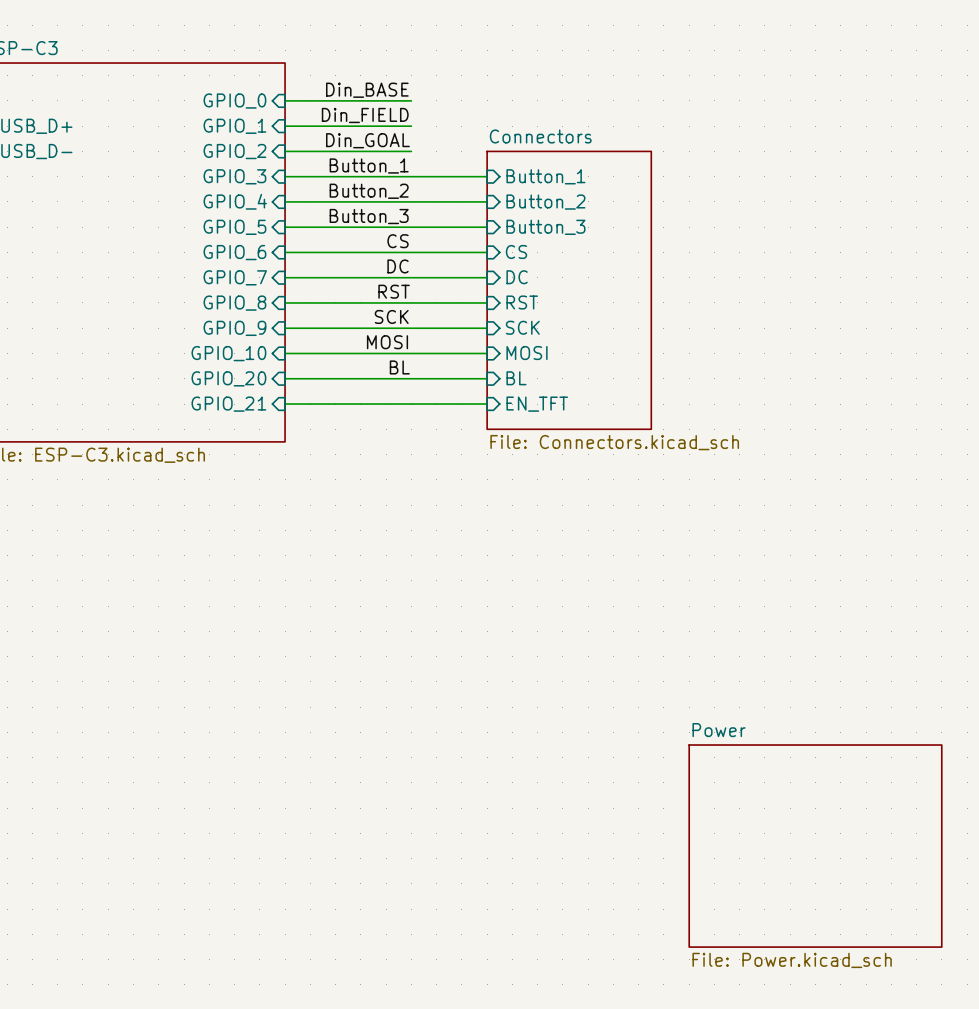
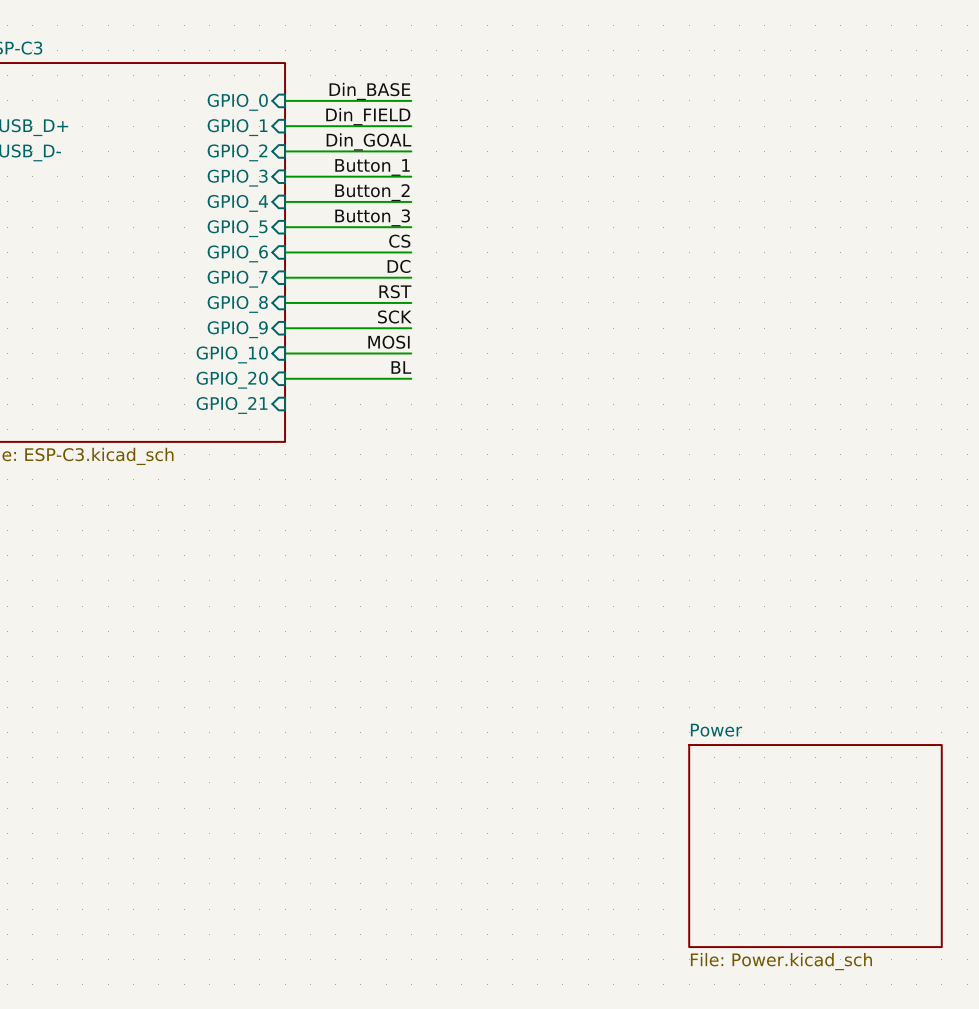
wire: (411, 176) (487, 176) -> none
sheet pin: Button_1 (545, 176) -> none
wire: (411, 201) (487, 201) -> none
sheet pin: Button_2 (545, 202) -> none
wire: (411, 227) (487, 227) -> none
sheet pin: Button_3 (545, 227) -> none
sheet pin: CS (516, 251) -> none
wire: (411, 252) (487, 252) -> none
wire: (411, 277) (487, 277) -> none
sheet pin: DC (517, 277) -> none
sheet Connectors: File: Connectors.kicad_sch (569, 290) -> none
wire: (411, 302) (487, 302) -> none
sheet pin: RST (522, 302) -> none
sheet pin: SCK (522, 327) -> none
wire: (411, 328) (487, 328) -> none
wire: (411, 353) (487, 353) -> none
sheet pin: MOSI (527, 353) -> none
wire: (411, 378) (487, 378) -> none
sheet pin: BL (516, 378) -> none
wire: (285, 404) (487, 404) -> none
sheet pin: EN_TFT (537, 404) -> none

